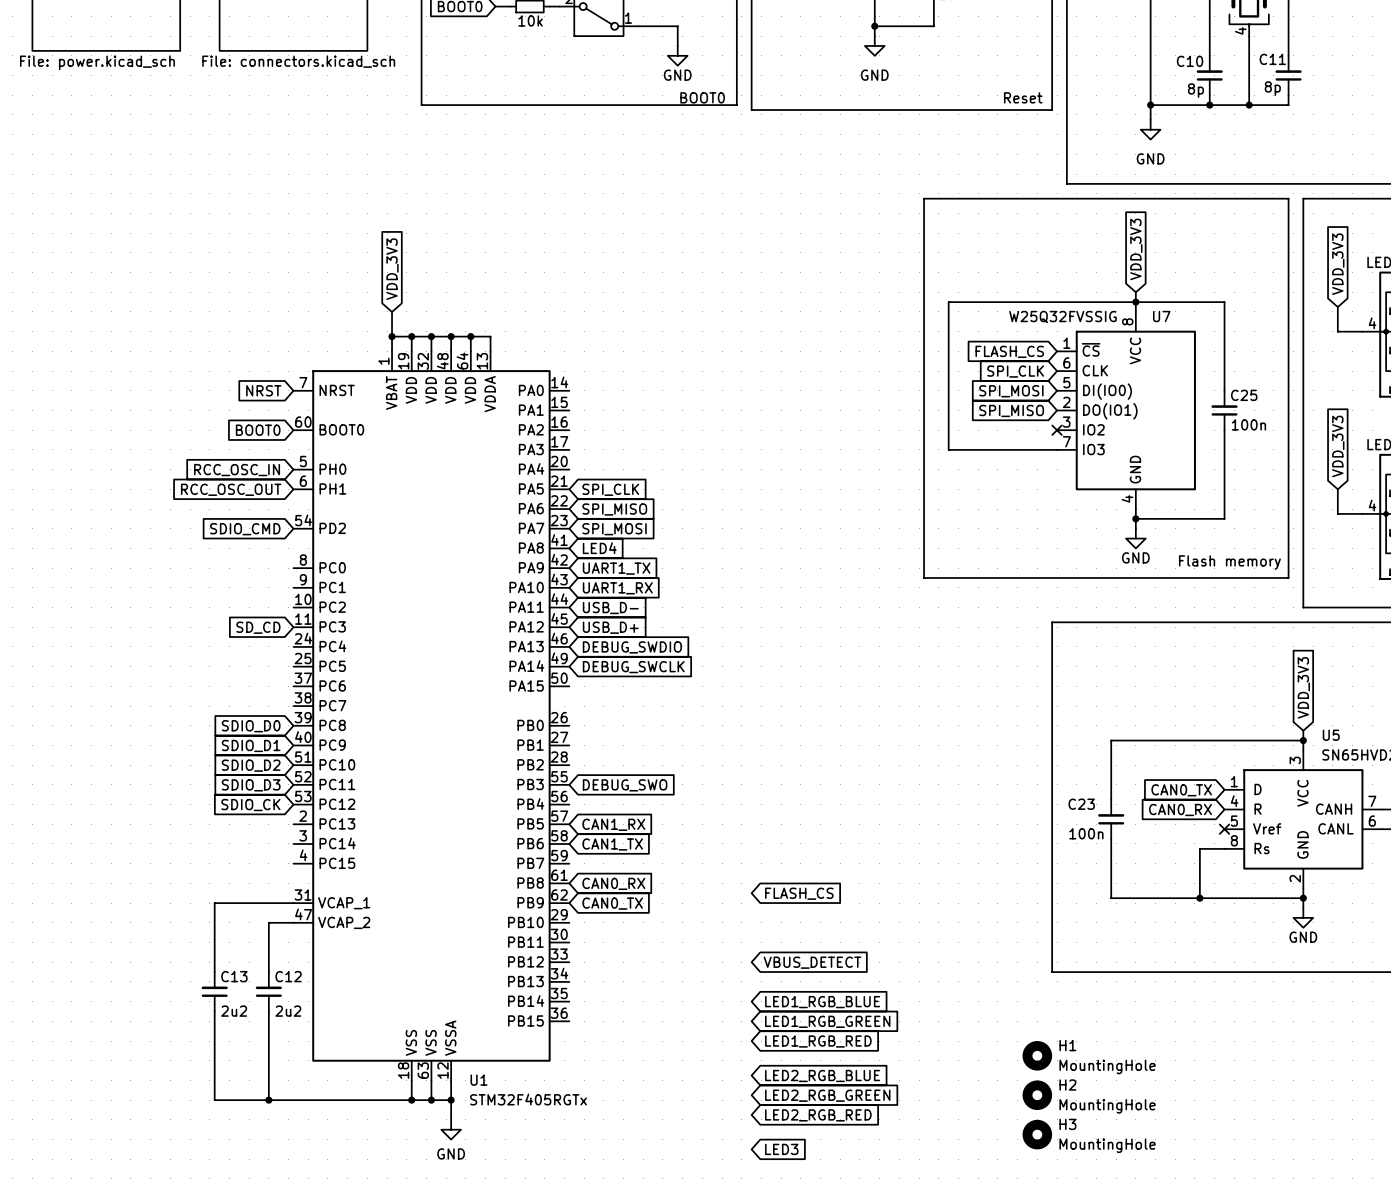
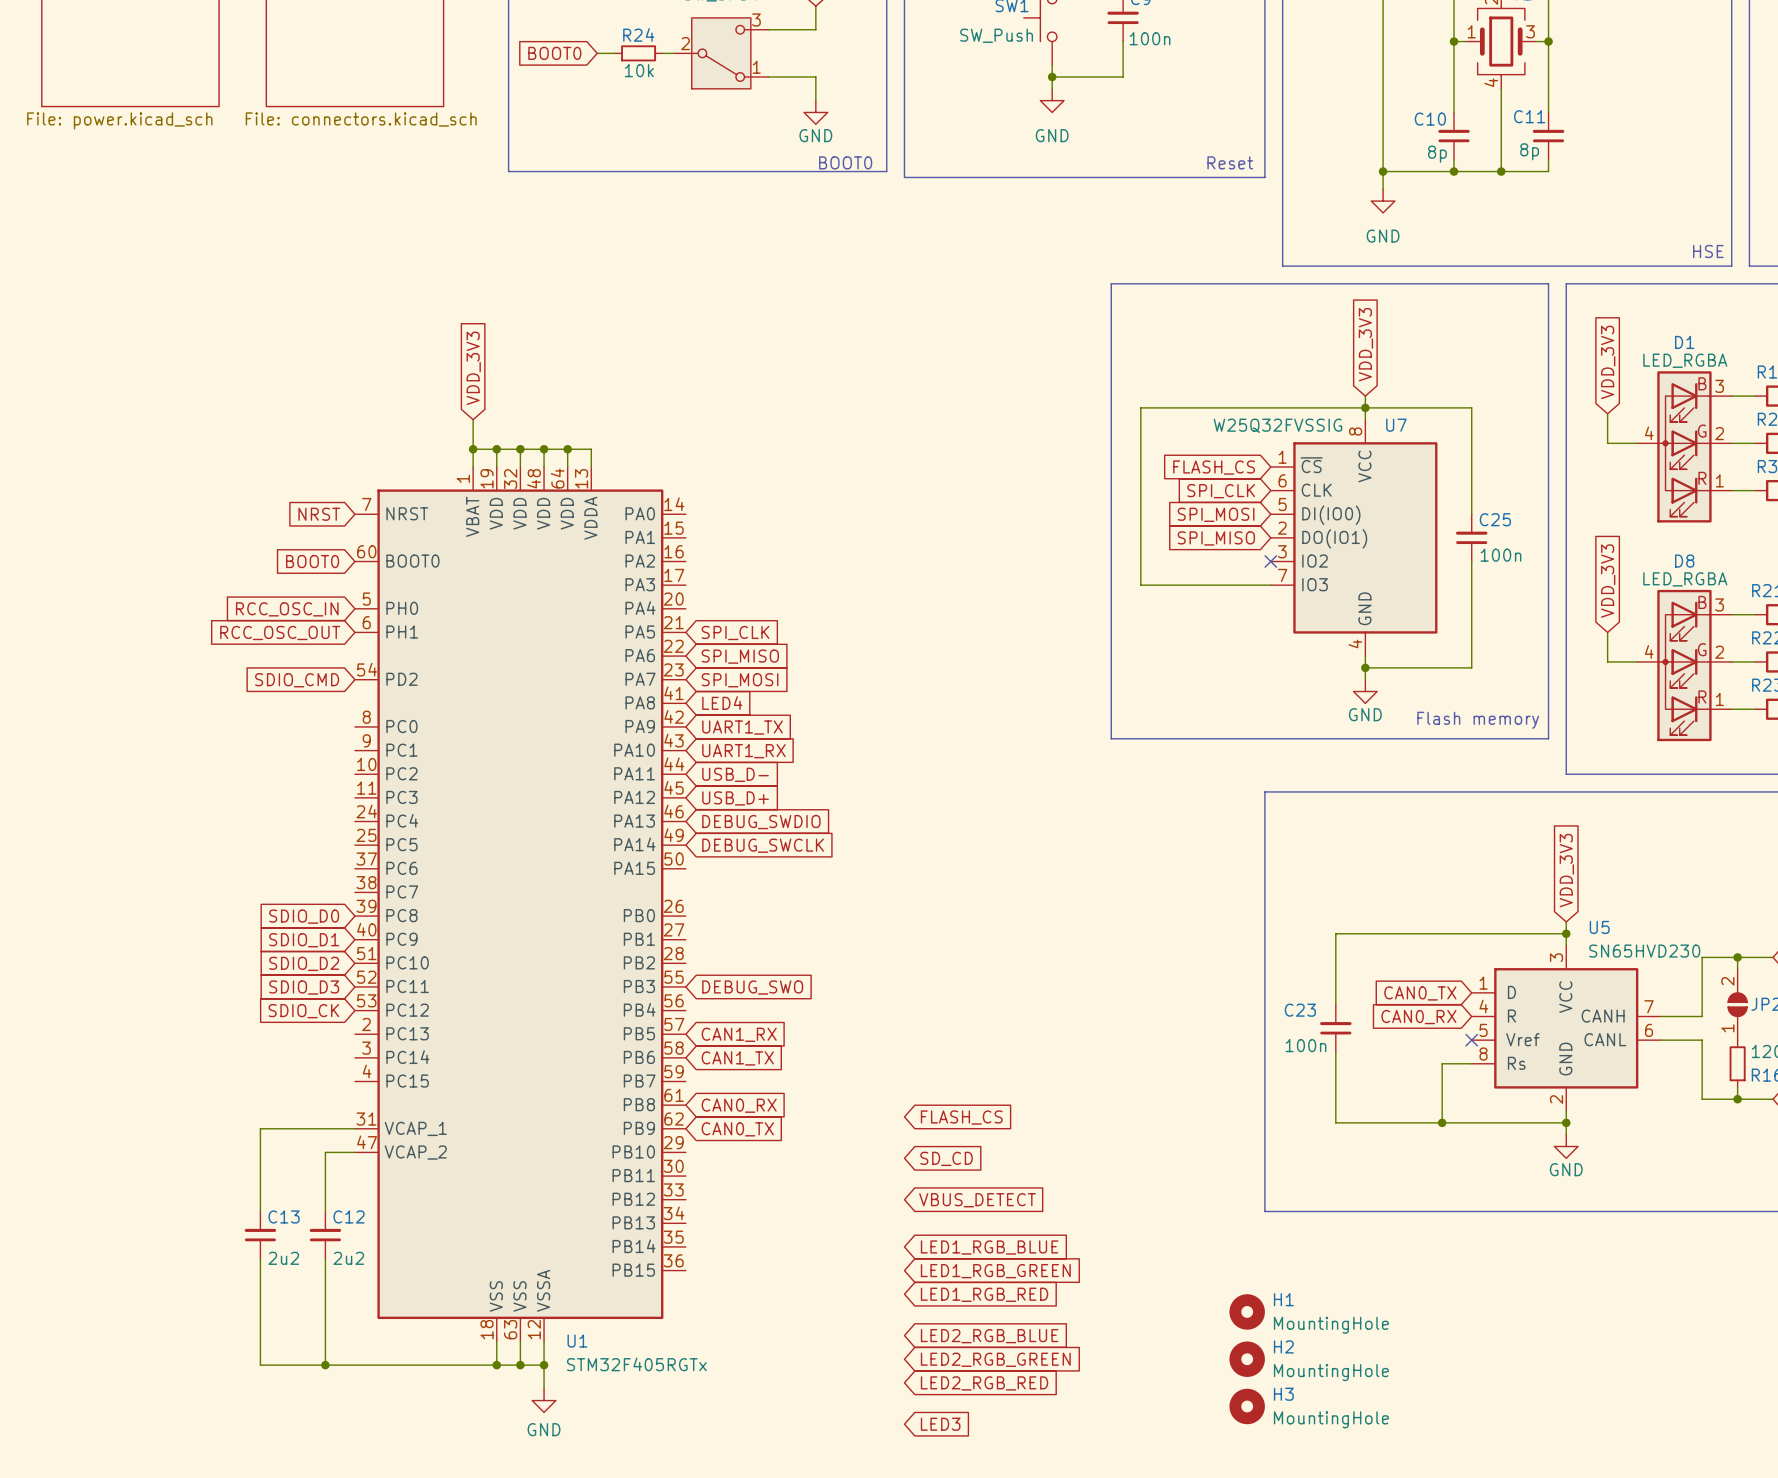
global label: SD_CD (258, 627) -> none
global label: none -> SD_CD (946, 1158)

